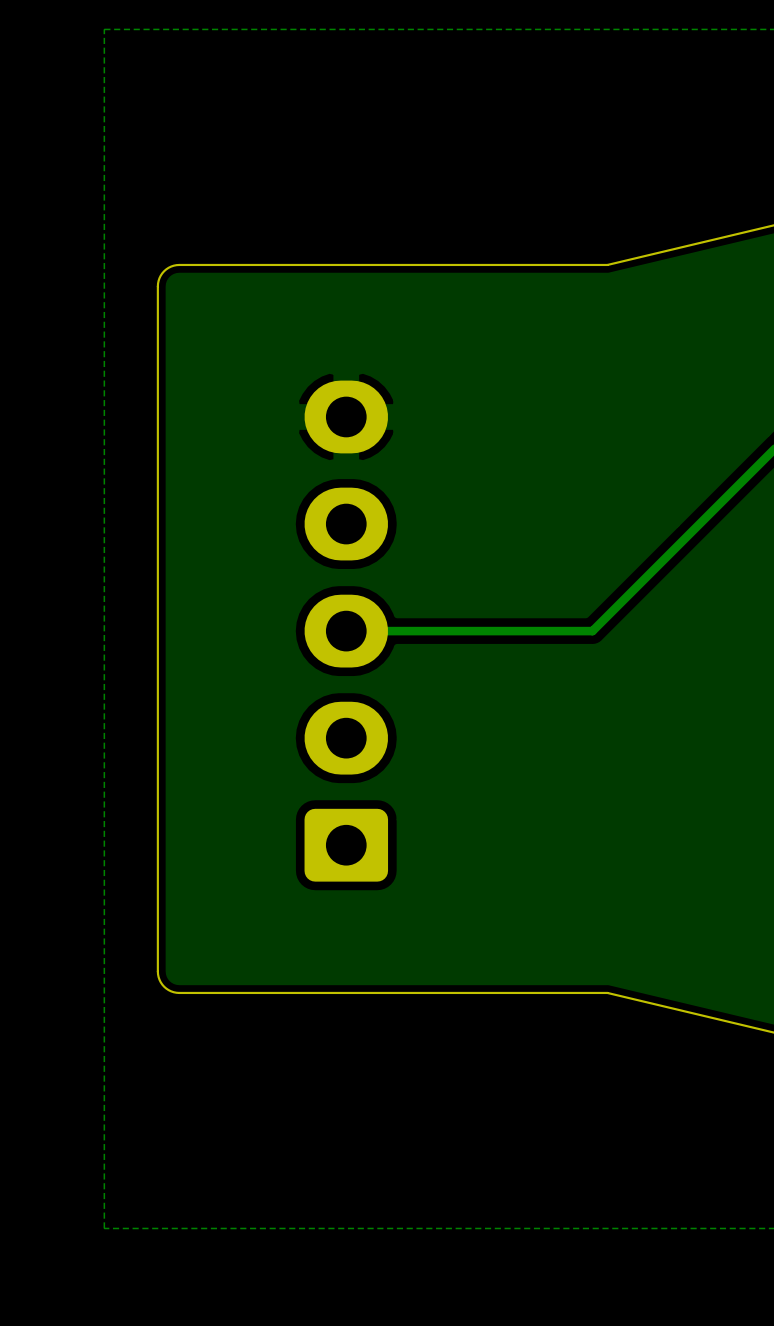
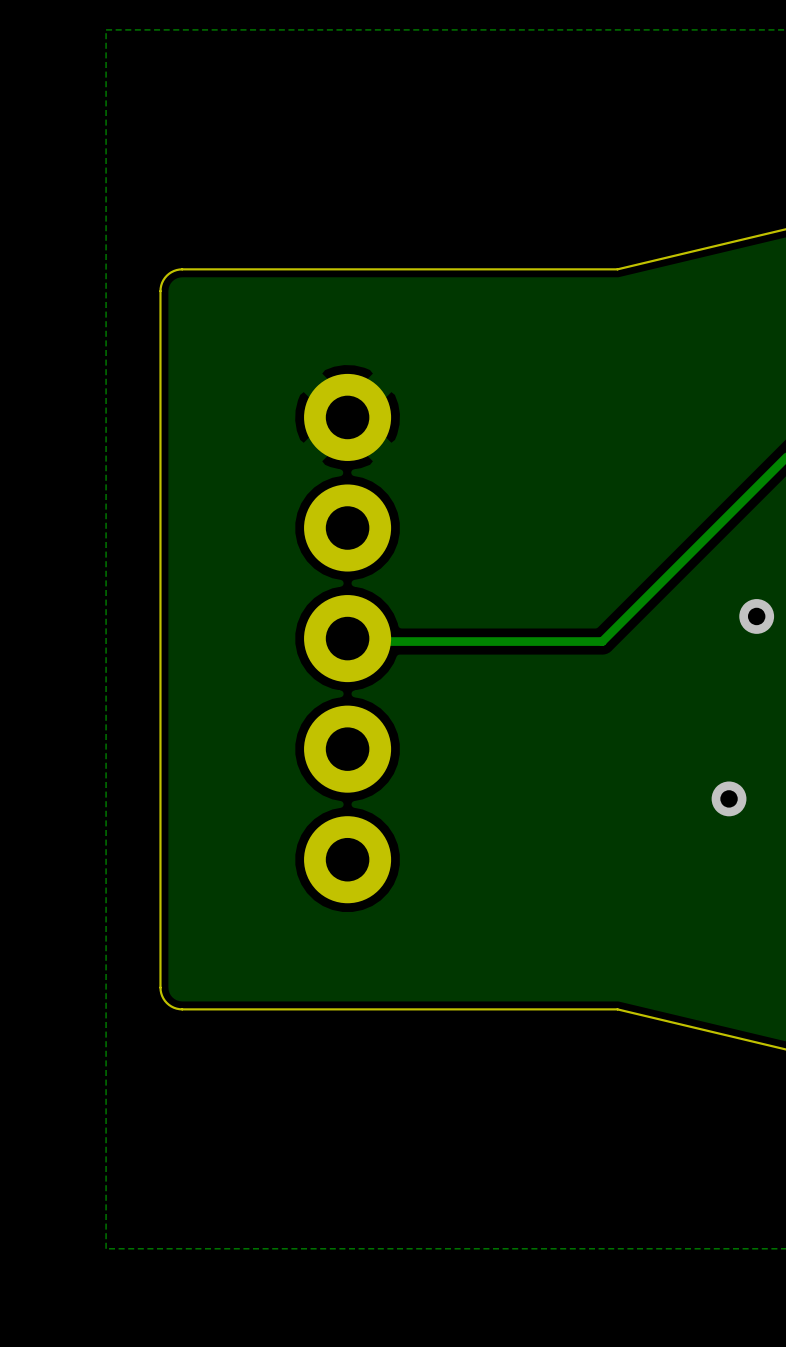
part footprint: [304, 380, 389, 882] -> [304, 373, 392, 904]
via: none -> (756, 616)
via: none -> (729, 798)

